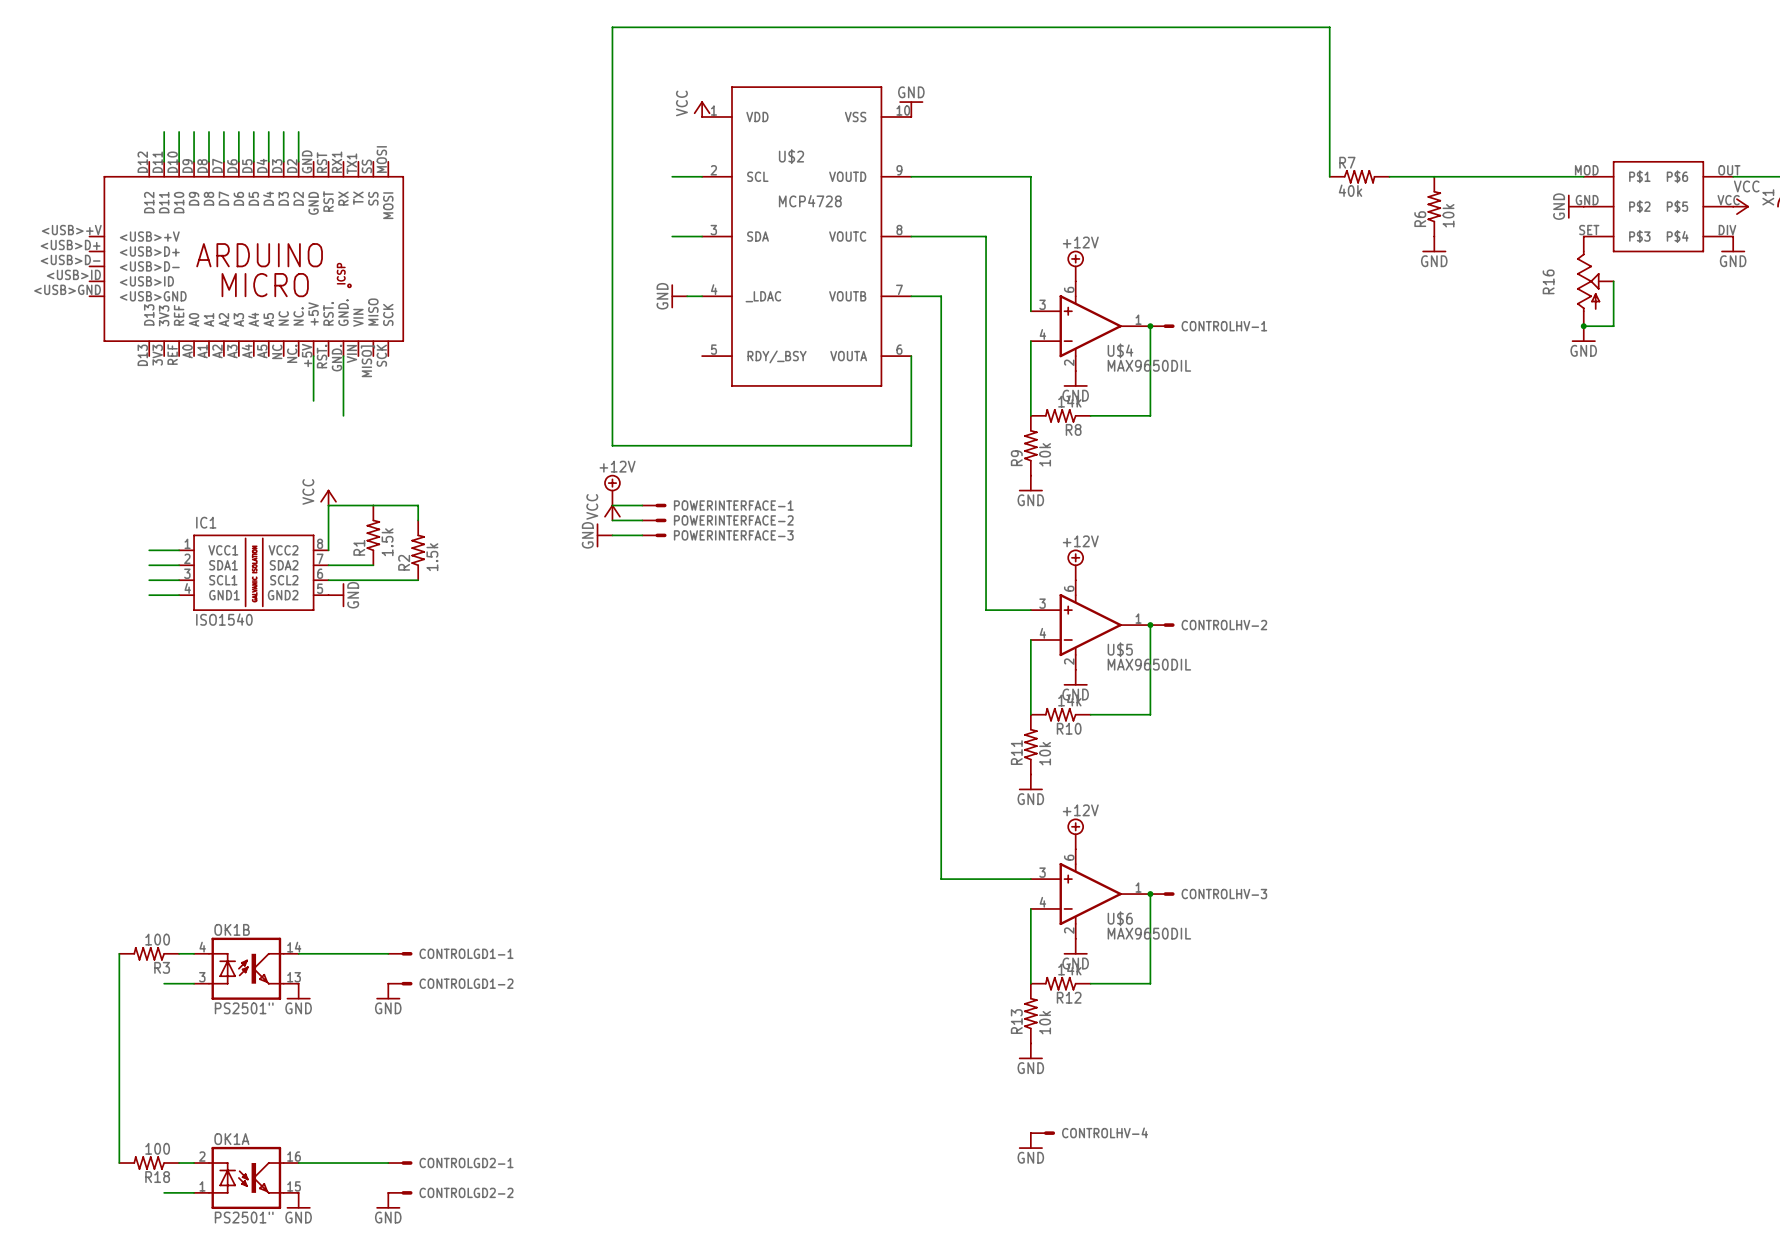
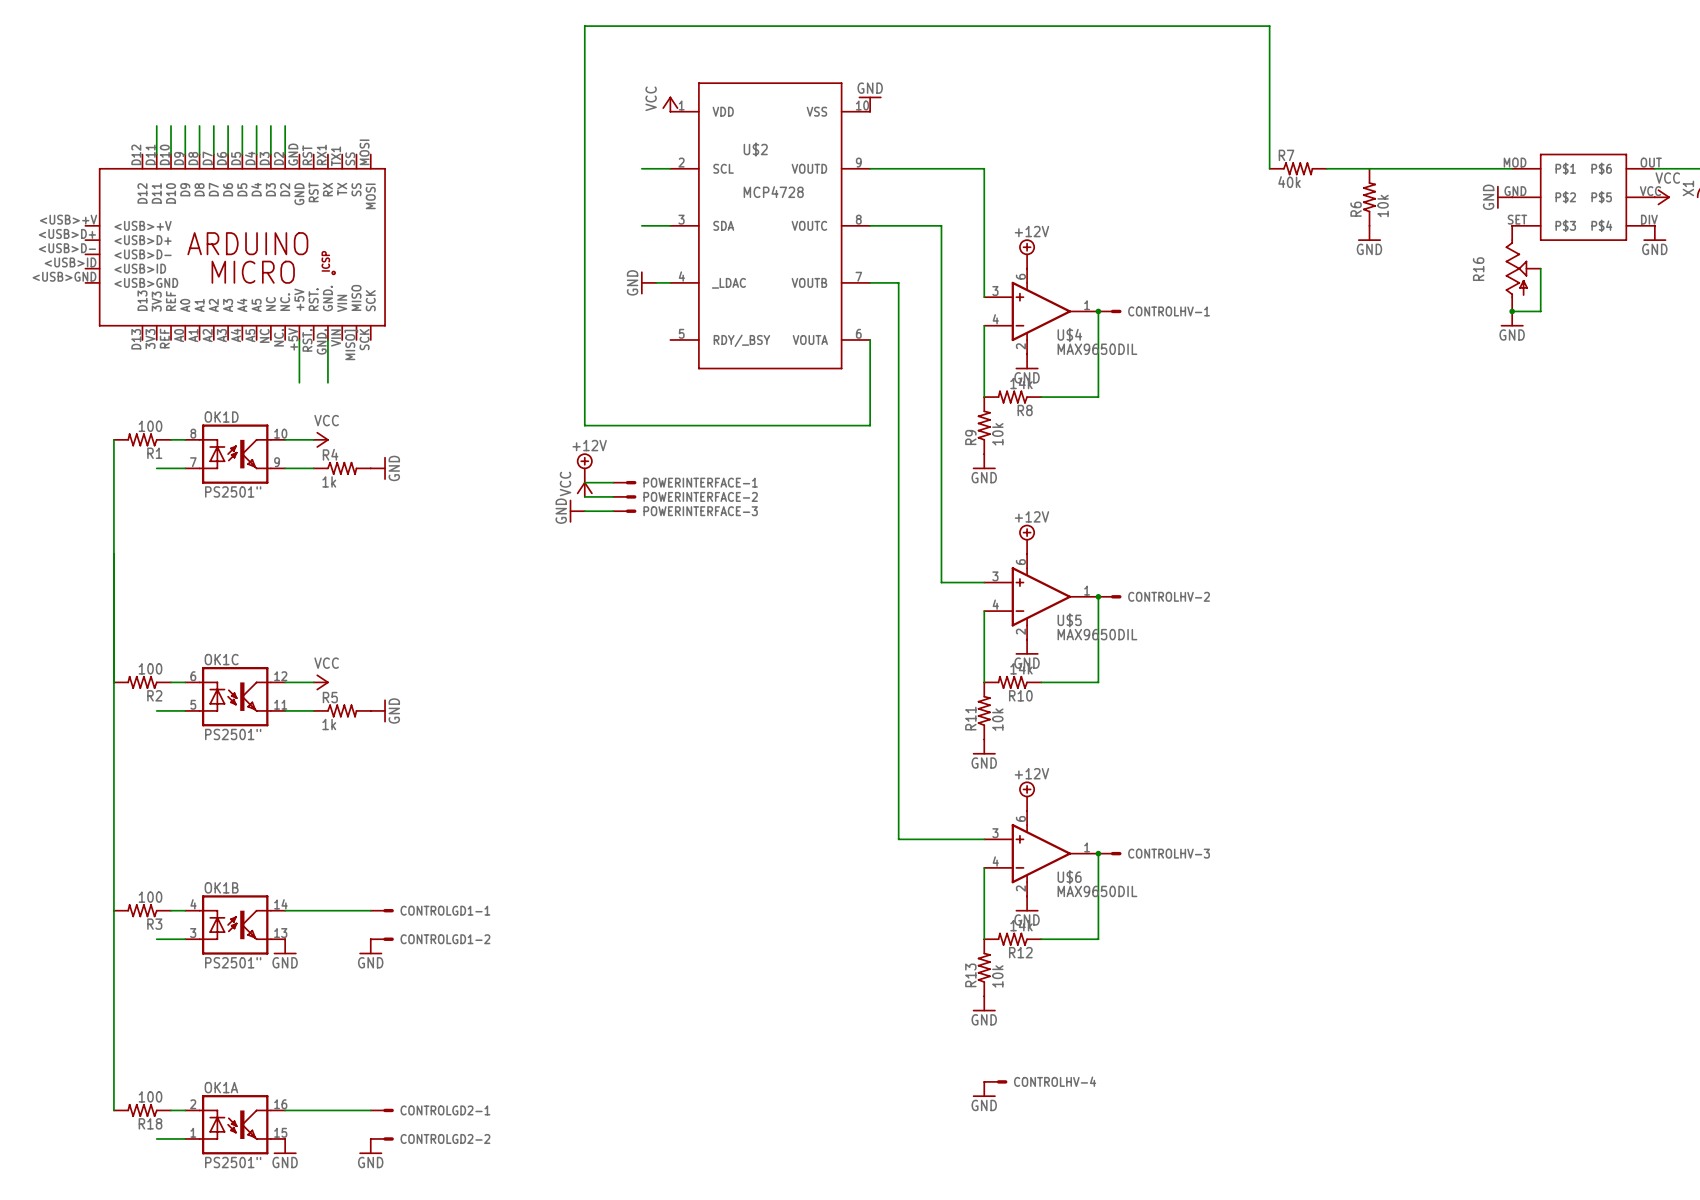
wire: (343, 400) (343, 415) -> none
wire: none -> (113, 439) (113, 910)
wire: none -> (171, 439) (185, 439)
wire: none -> (285, 439) (313, 439)
OK1D: none -> PS2501" (235, 454)
wire: none -> (285, 468) (313, 468)
R4: none -> 1k (342, 468)
power symbol: none -> GND (378, 468)
power symbol rotation: 0° (328, 496) -> 90° clockwise (322, 439)
power symbol position: VCC (328, 497) -> VCC (321, 439)
wire: (418, 520) (418, 505) (328, 505) (328, 550) -> none
R1 rotation: 0° (373, 535) -> 90° counterclockwise (142, 439)
R1 position: (373, 535) -> (142, 439)
R1 value: 1.5k (387, 542) -> 100 (150, 426)
wire: (149, 550) (179, 550) -> (156, 468) (185, 468)
R2 rotation: 0° (418, 550) -> 90° counterclockwise (142, 682)
R2 position: (418, 550) -> (142, 682)
R2 value: 1.5k (432, 557) -> 100 (150, 668)
wire: (149, 565) (179, 565) -> none
wire: (328, 565) (373, 565) -> none
IC1: ISO1540 (253, 572) -> none
wire: (149, 580) (179, 580) -> none
wire: (328, 580) (418, 580) -> none
wire: (149, 595) (179, 595) -> none
power symbol: GND (336, 595) -> none
wire: none -> (171, 682) (185, 682)
wire: none -> (285, 682) (313, 682)
power symbol: none -> VCC (321, 682)
OK1C: none -> PS2501" (235, 696)
wire: none -> (156, 710) (185, 710)
wire: none -> (285, 710) (313, 710)
R5: none -> 1k (342, 710)
power symbol: none -> GND (378, 710)

